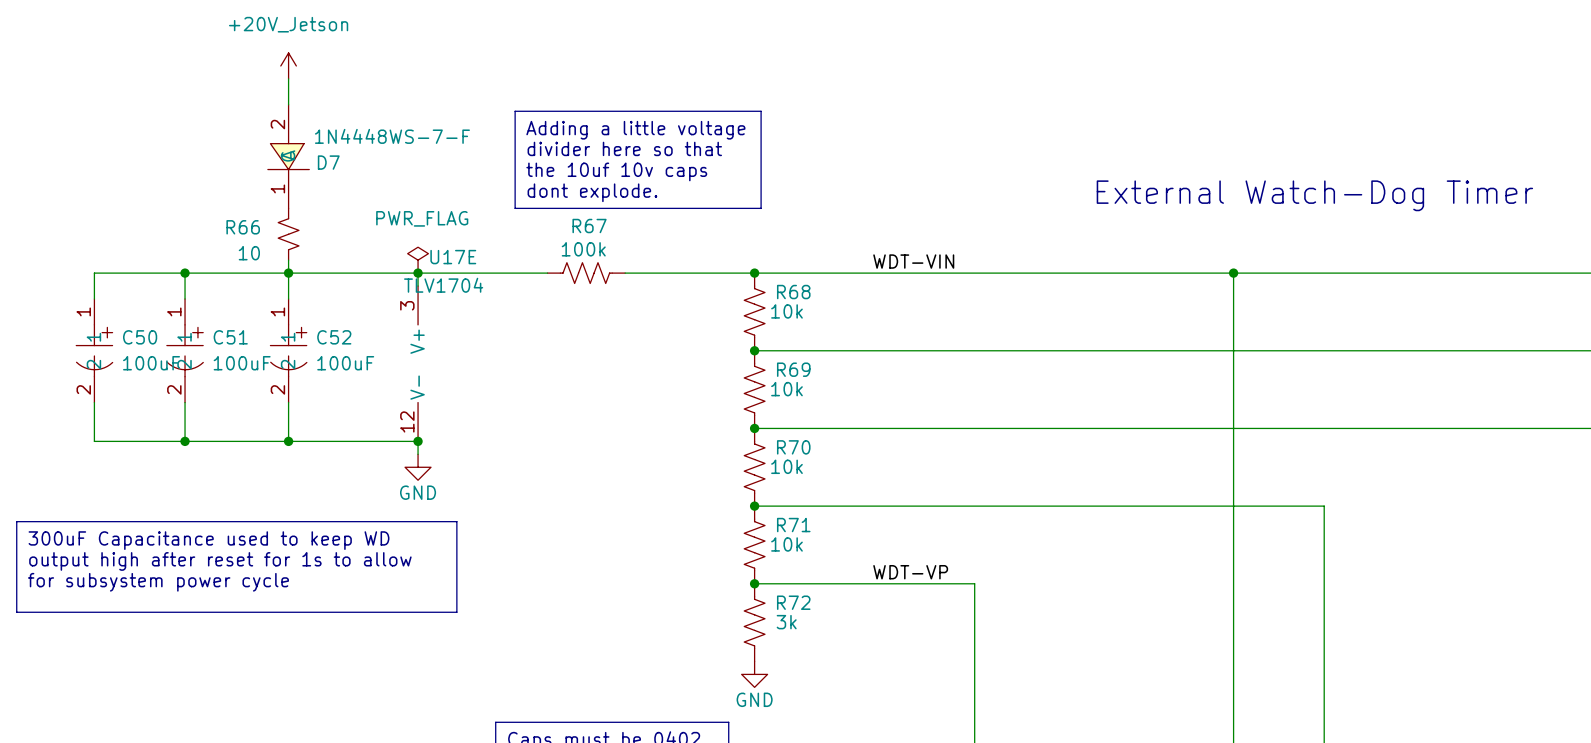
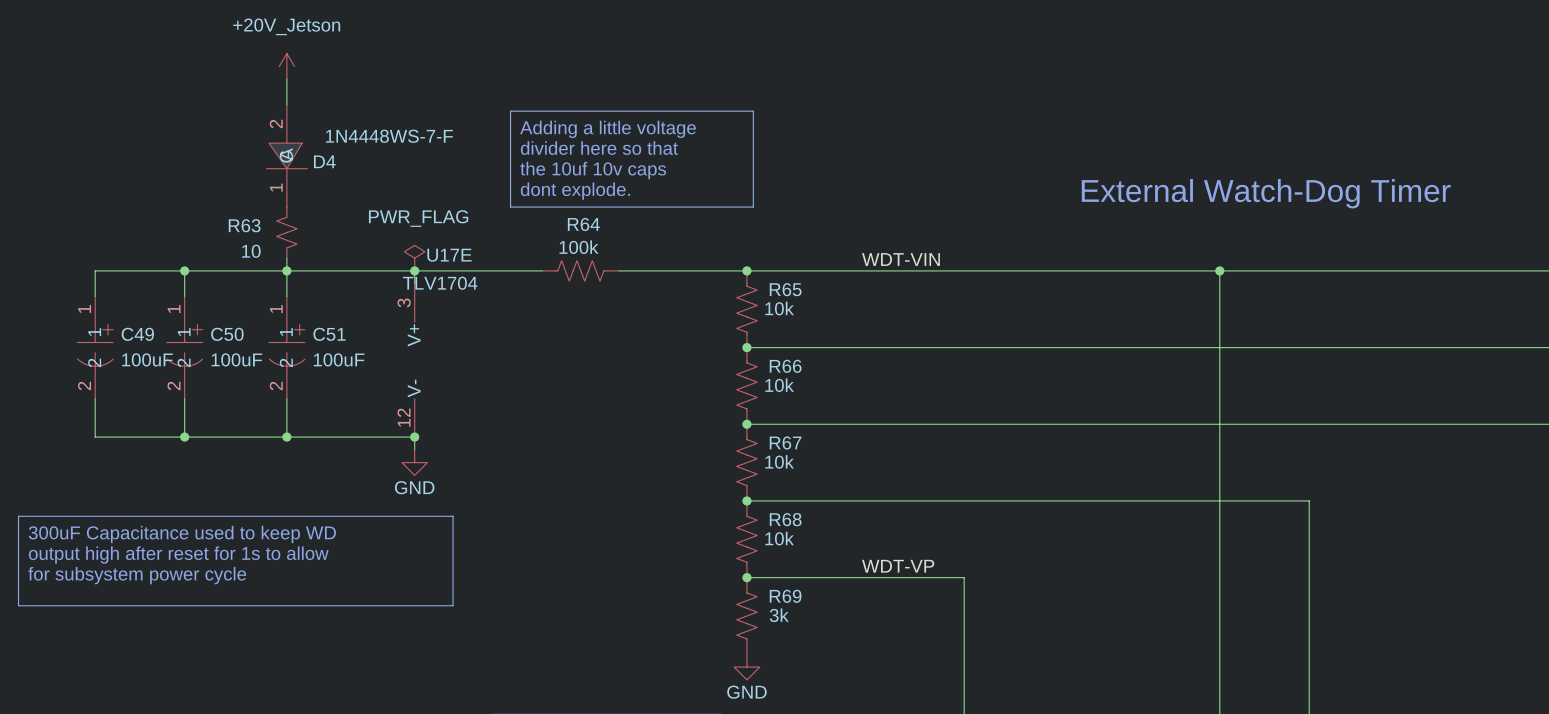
D7 name: D7 (328, 162) -> D4 (324, 161)
R67 name: R67 (589, 226) -> R64 (583, 224)
R66 name: R66 (243, 227) -> R63 (244, 225)
R68 name: R68 (793, 292) -> R65 (785, 289)
C50 name: C50 (140, 337) -> C49 (137, 334)
C51 name: C51 (230, 337) -> C50 (227, 334)
C52 name: C52 (334, 337) -> C51 (329, 334)
R69 name: R69 (793, 369) -> R66 (785, 366)
R70 name: R70 (793, 447) -> R67 (785, 442)
R71 name: R71 (793, 525) -> R68 (785, 519)
R72 name: R72 (793, 602) -> R69 (785, 596)

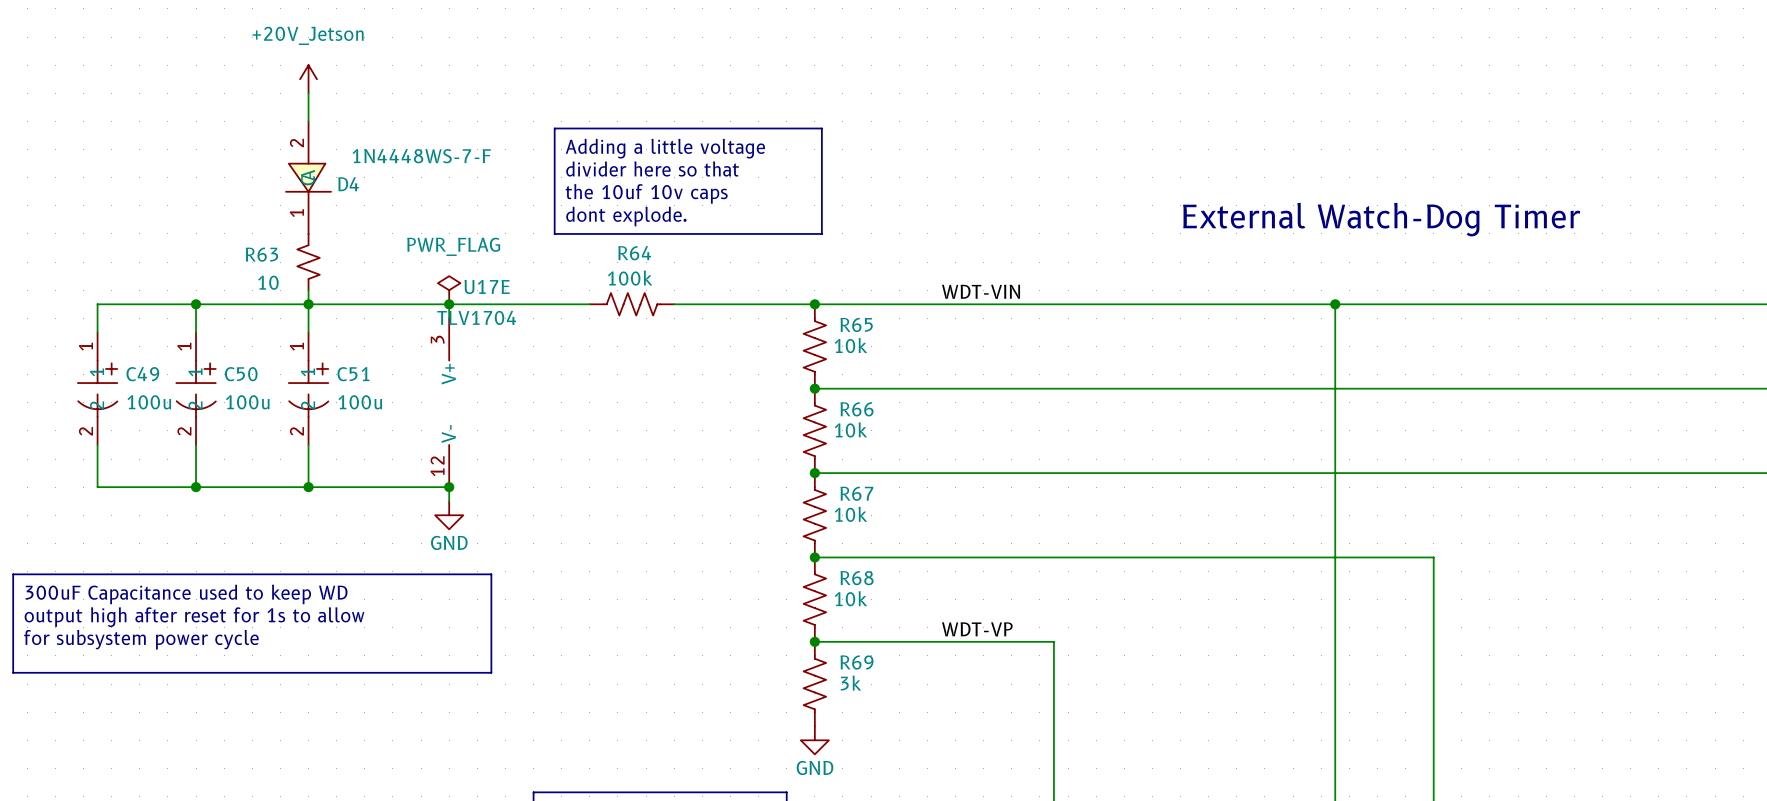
C49 value: 100uF (147, 359) -> 100u (149, 402)
C50 value: 100uF (236, 359) -> 100u (247, 402)
C51 value: 100uF (339, 359) -> 100u (360, 402)

